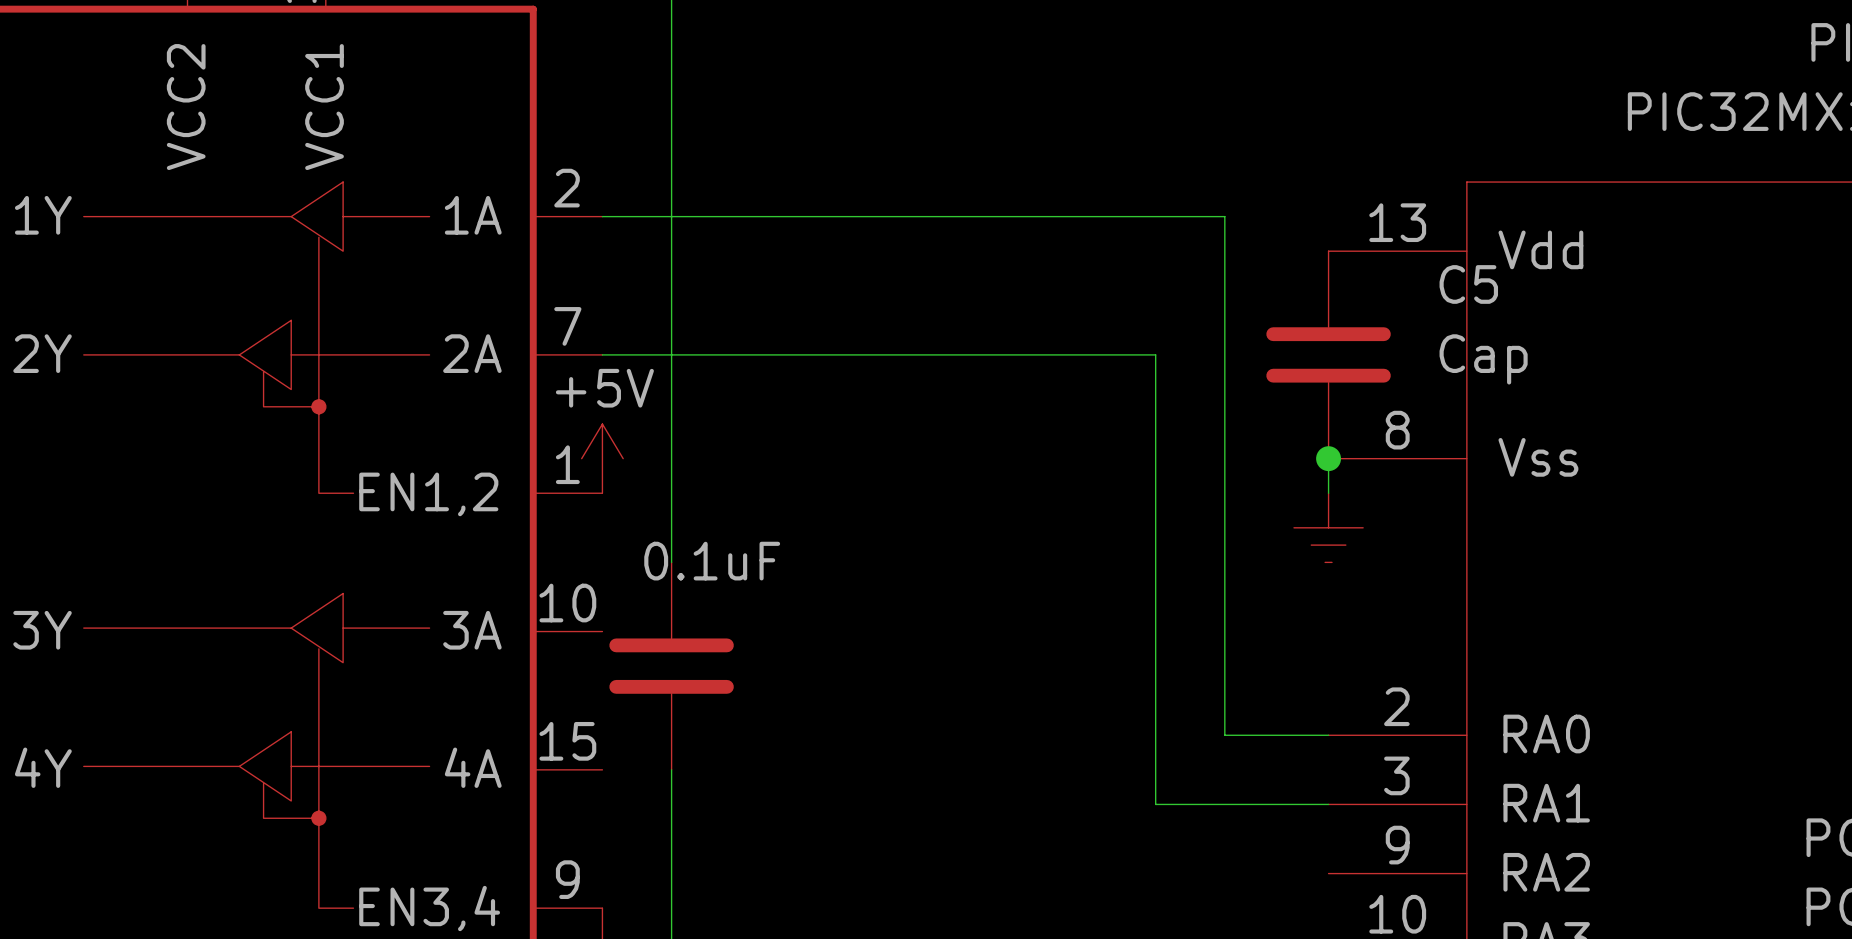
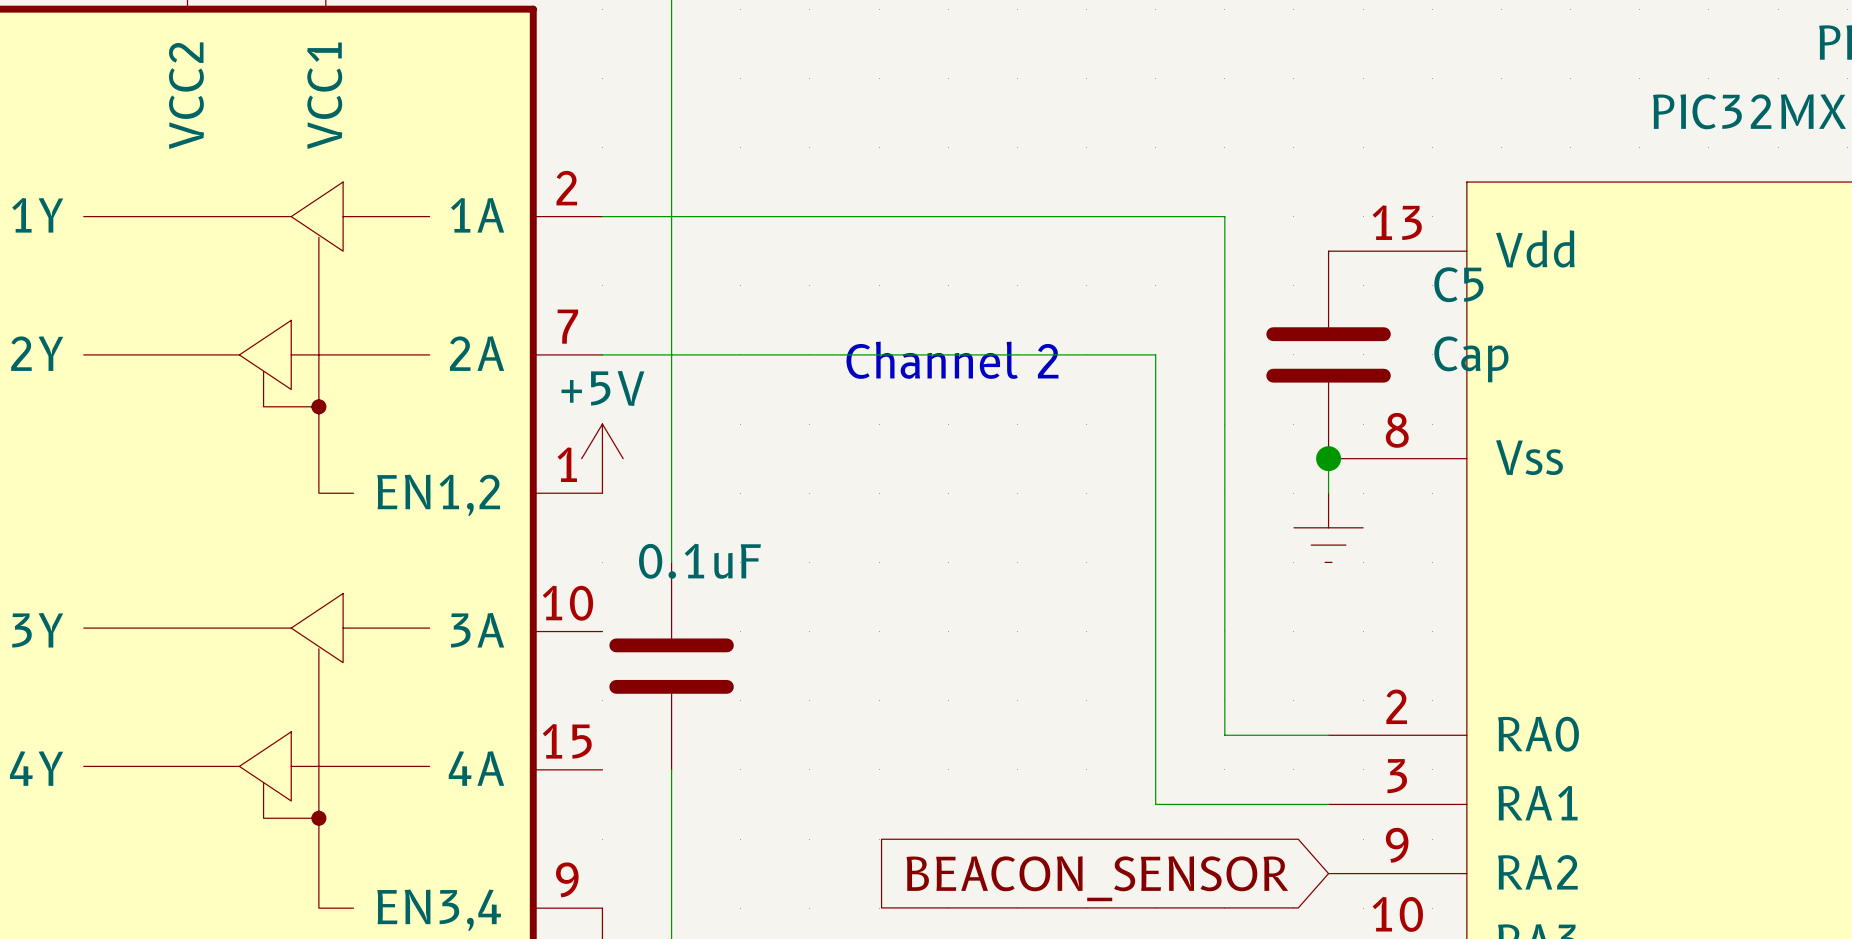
text: none -> Channel 2 (952, 360)
global label: none -> BEACON_SENSOR (1097, 878)

